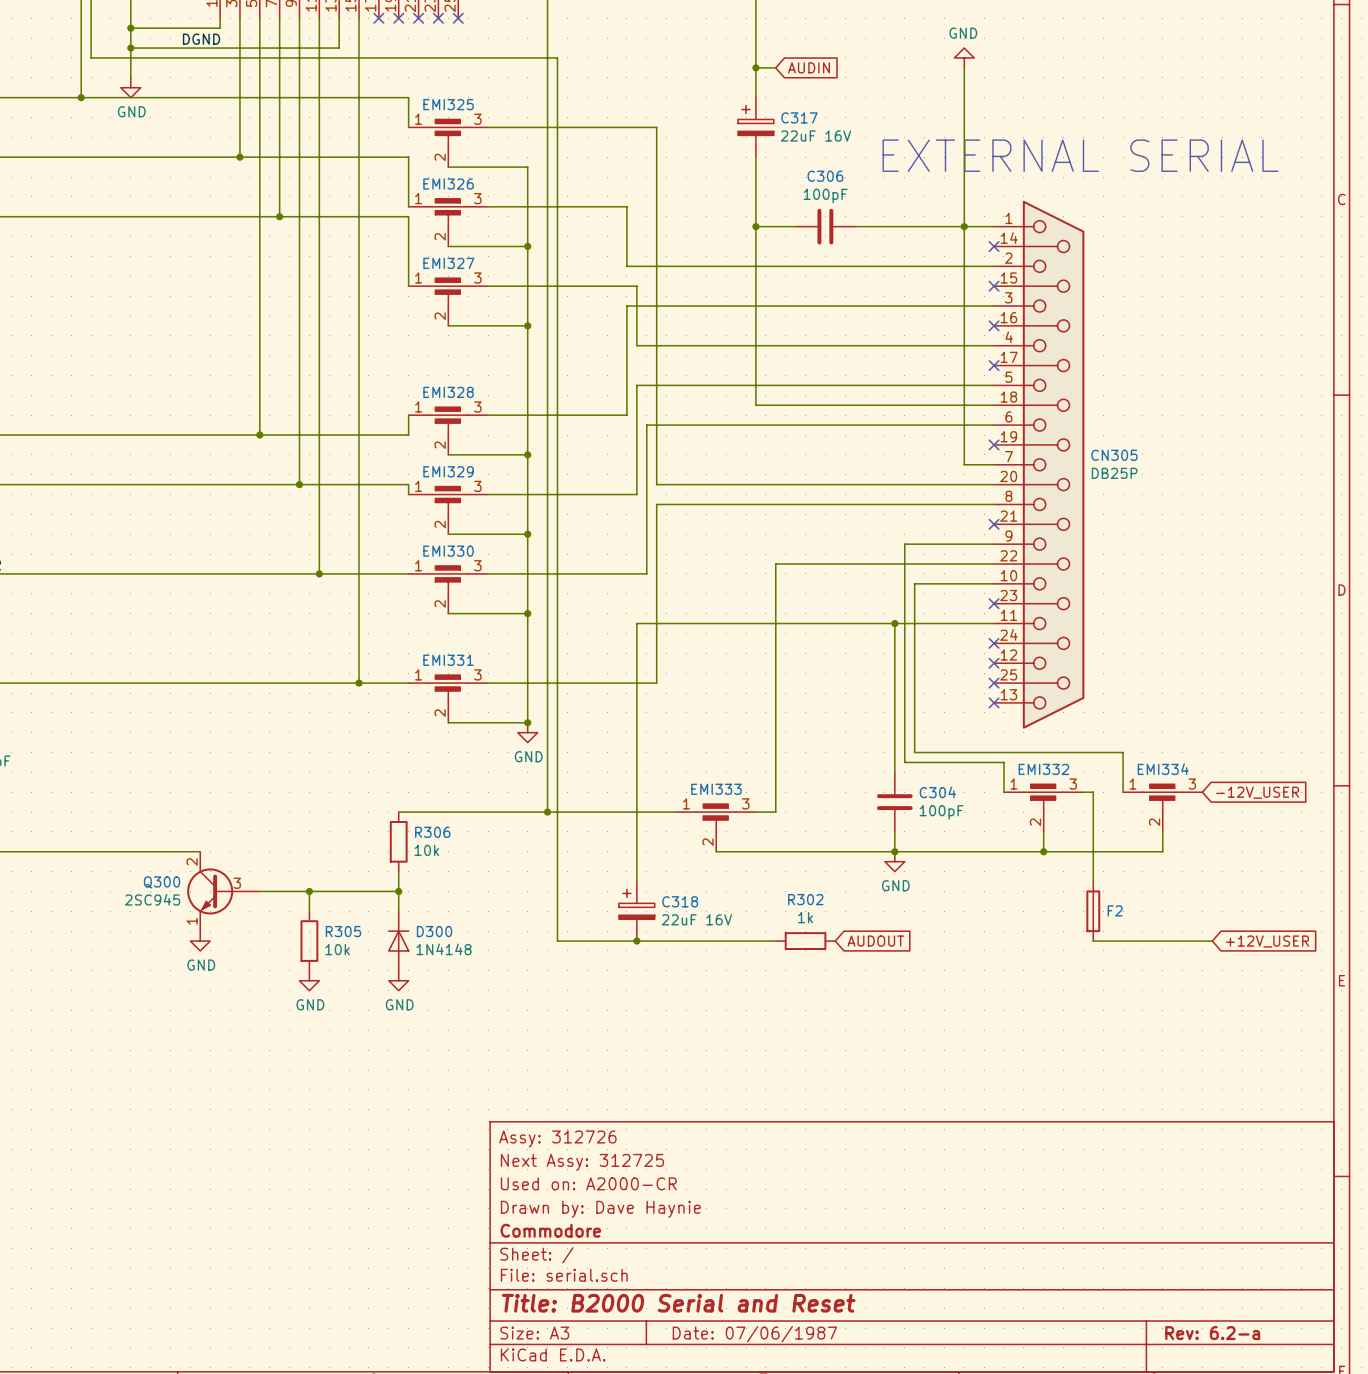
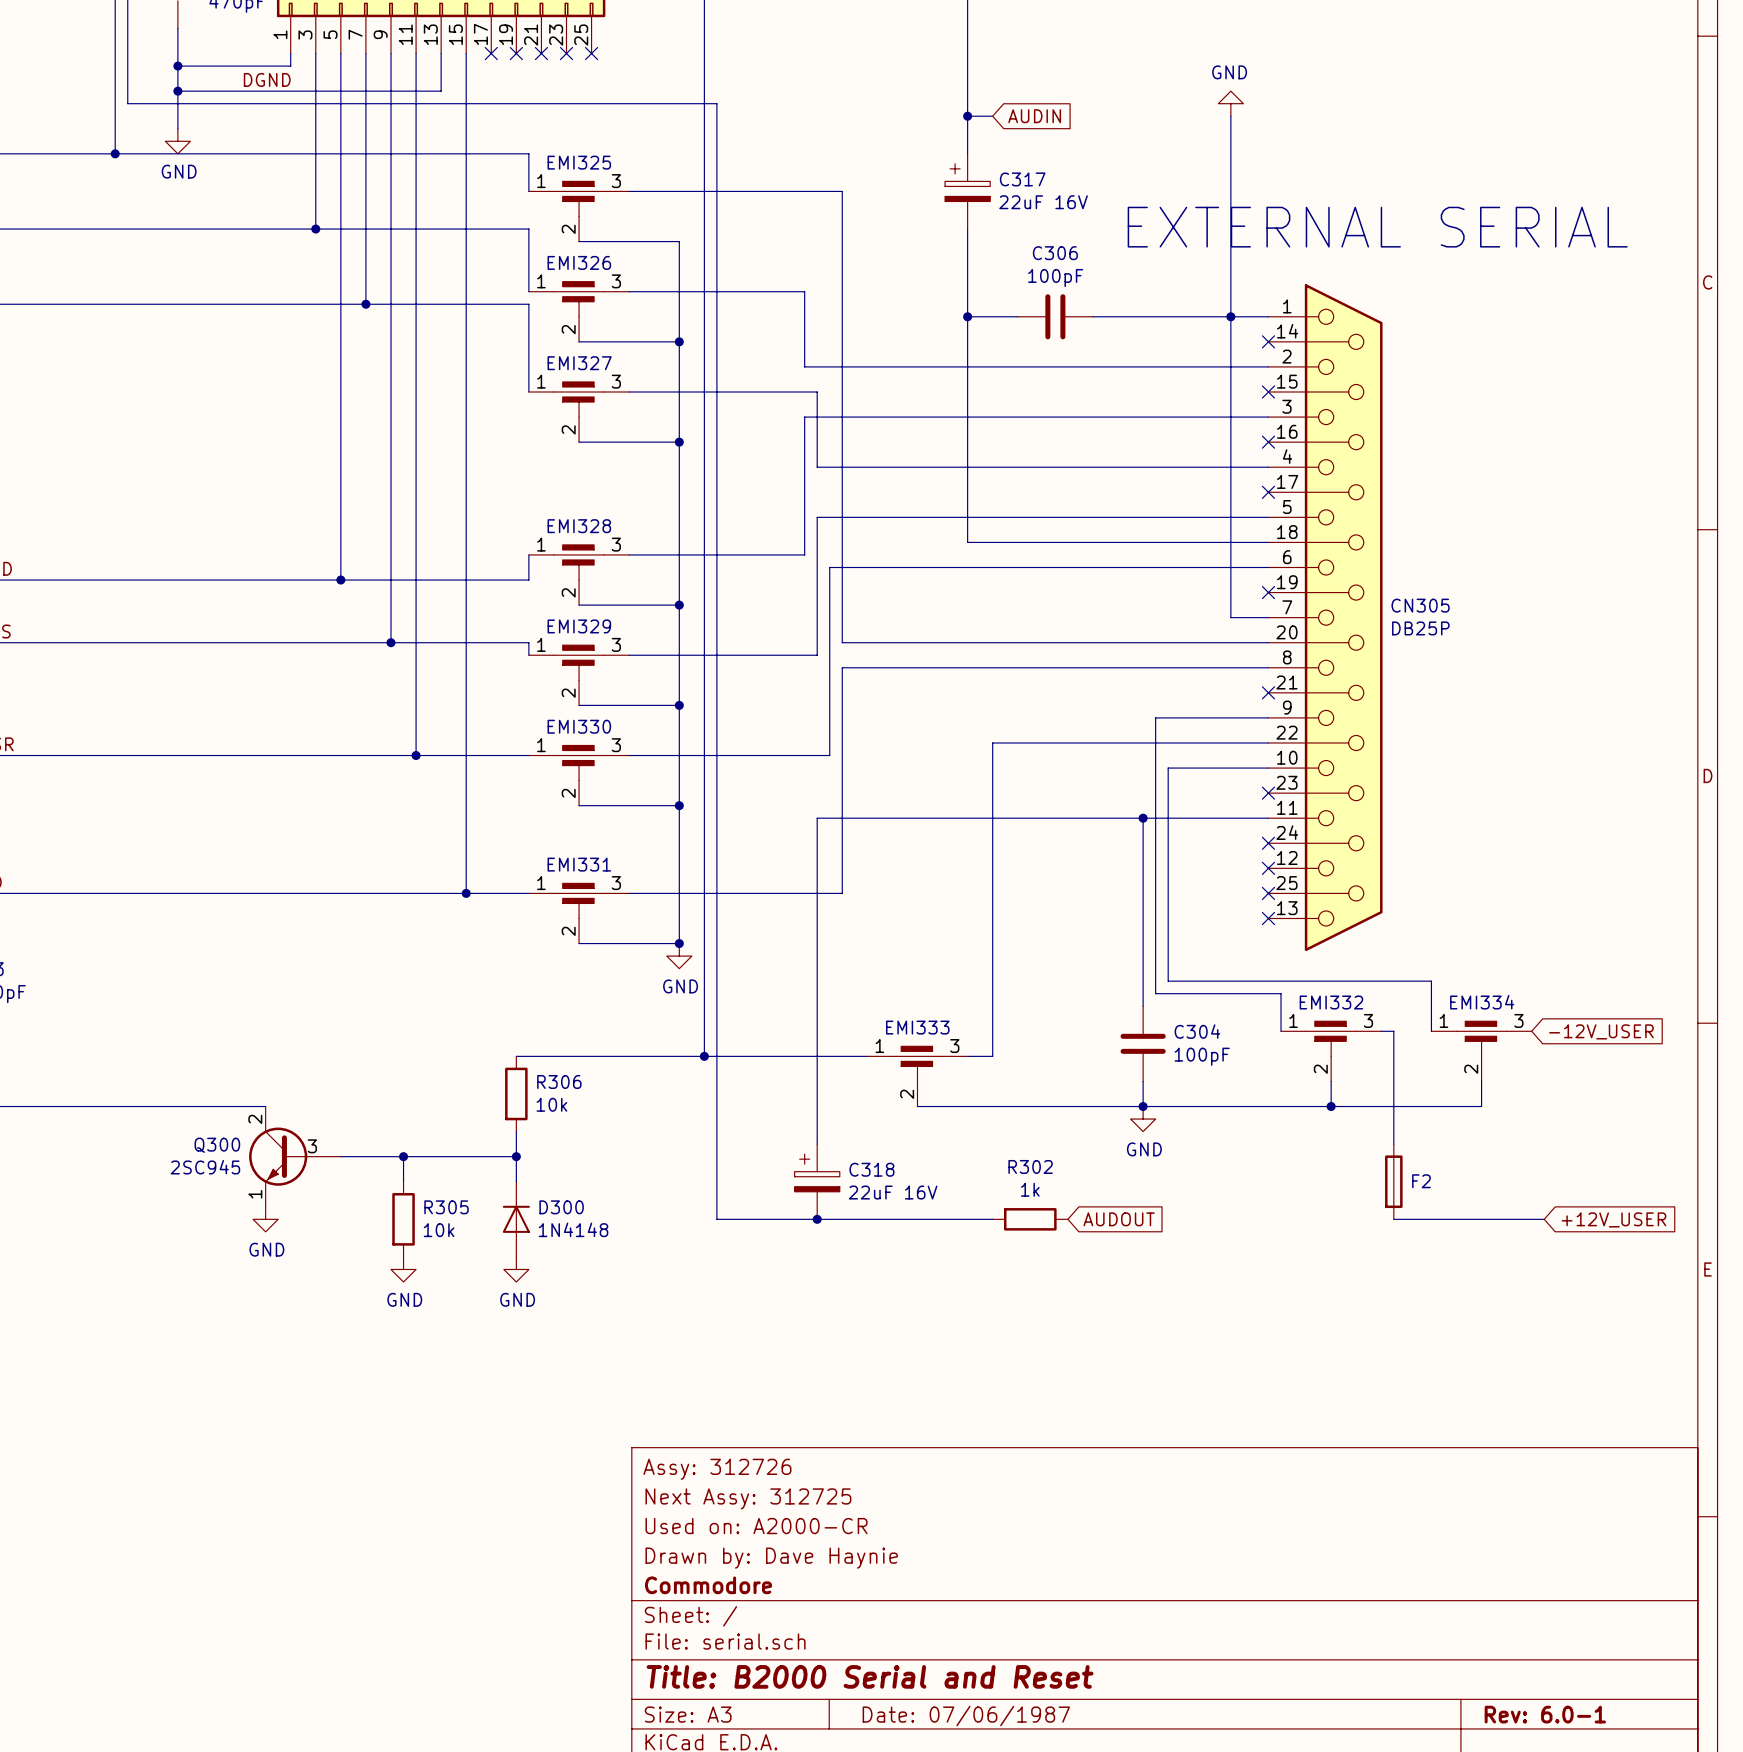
title block: Rev: 6.2-a (1212, 1333) -> Rev: 6.0-1 (1545, 1714)

